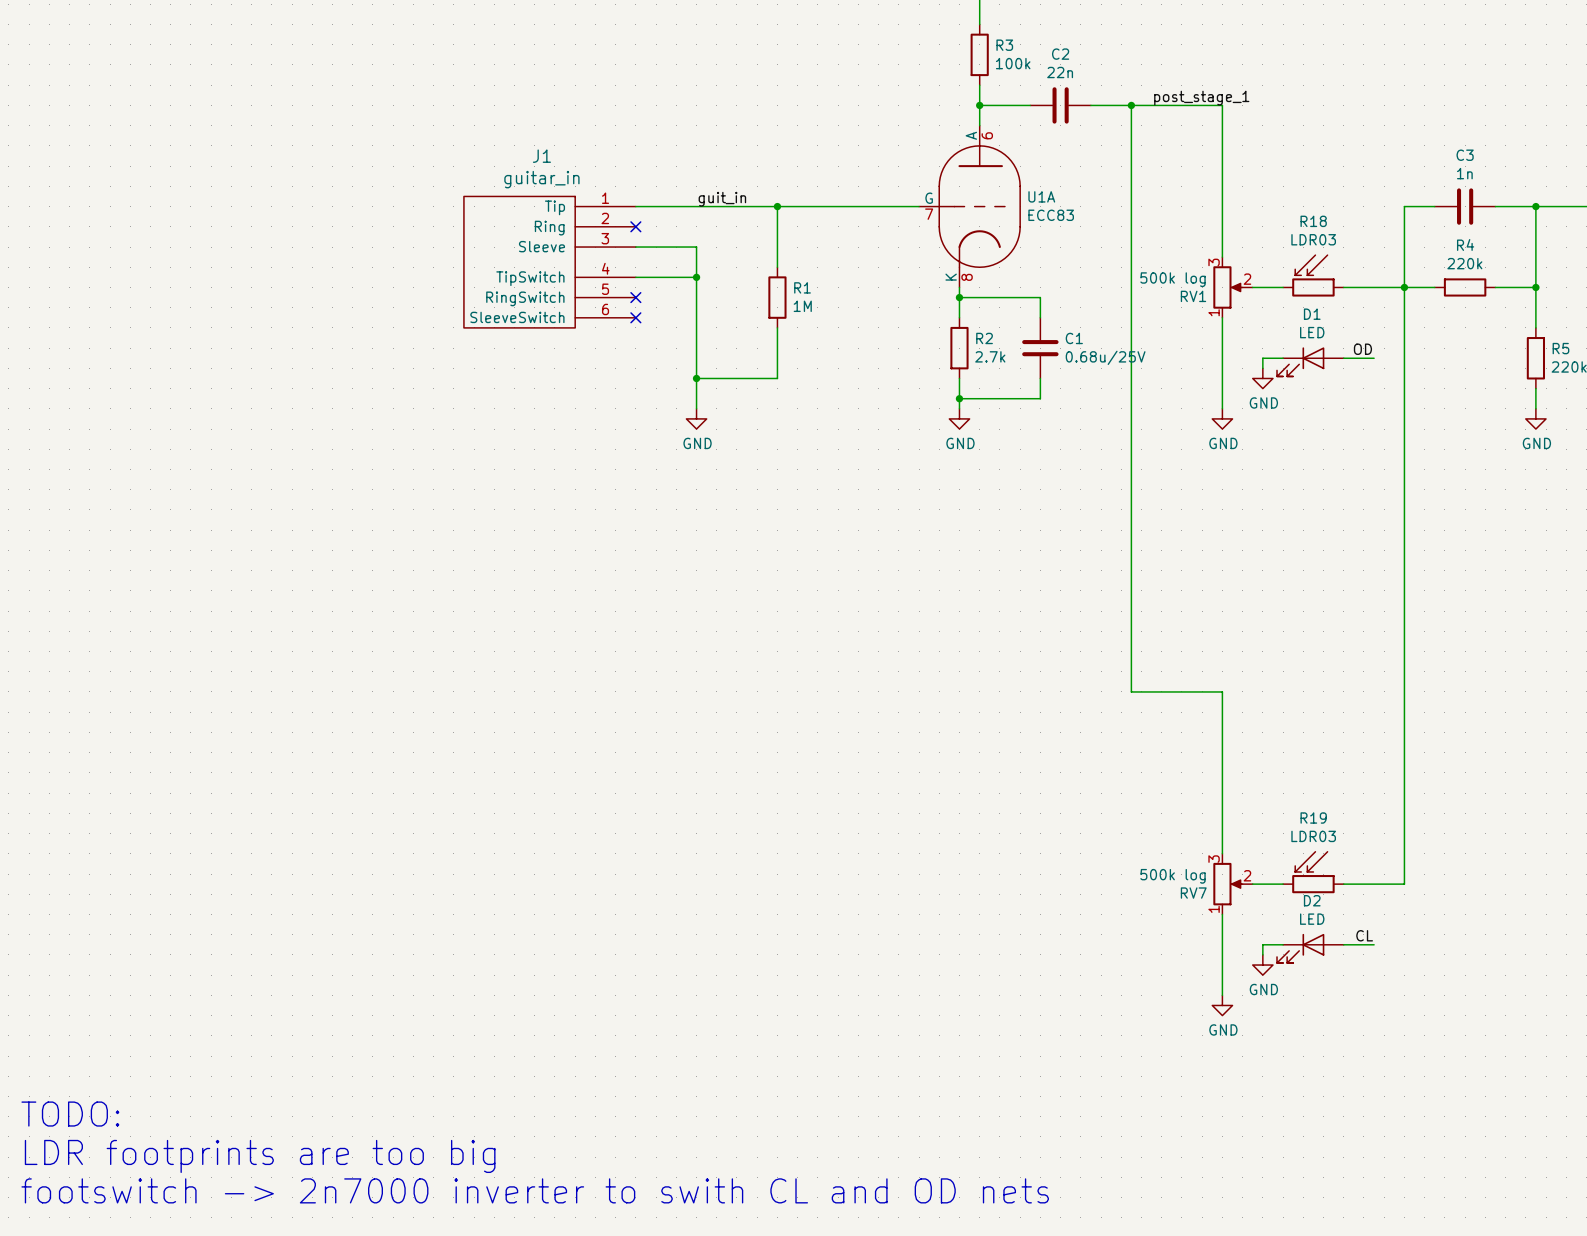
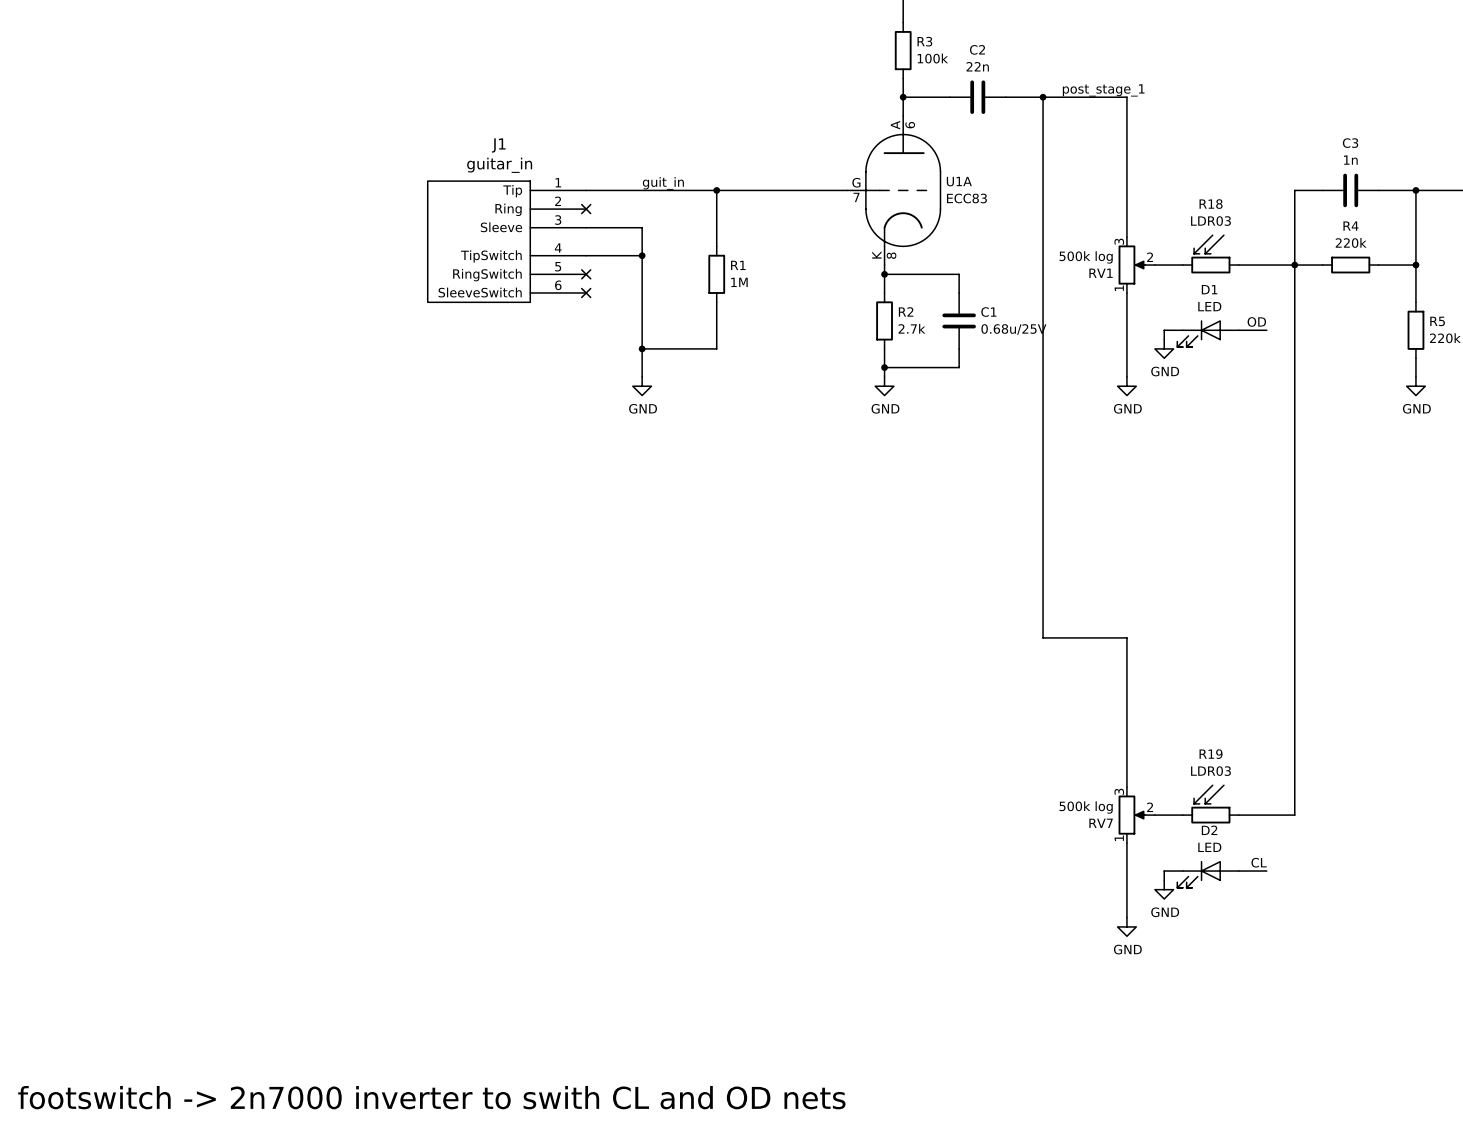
text: TODO: (70, 1114) -> none
text: LDR footprints are too big (260, 1156) -> none

